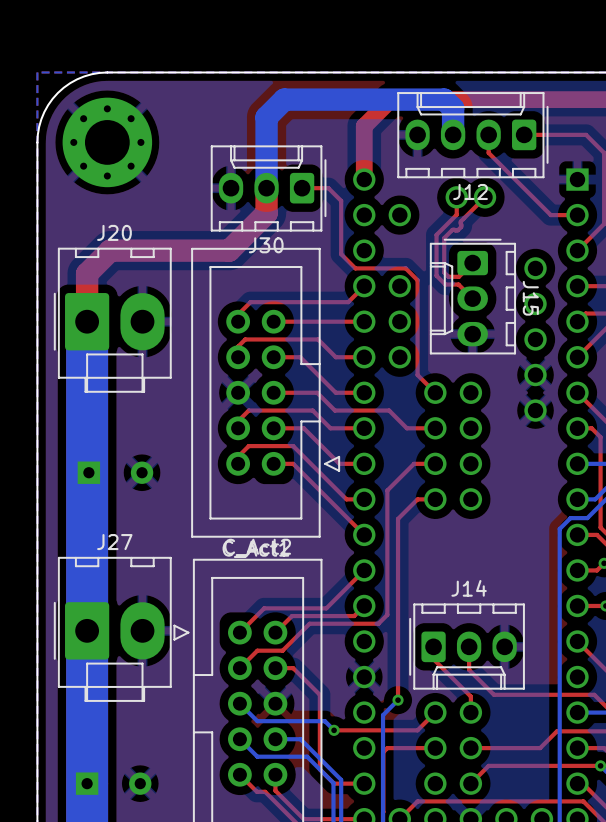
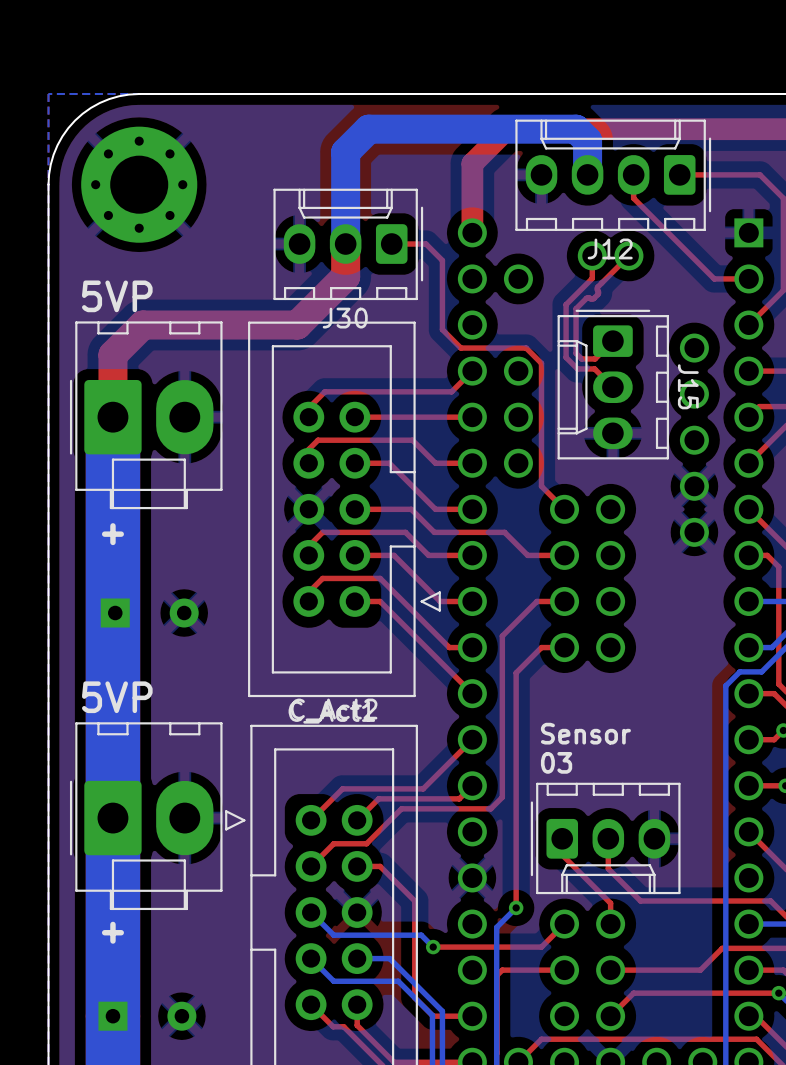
text: none -> 5VP (117, 296)
J20 name: J20 (114, 232) -> none
text: none -> + (112, 534)
text: none -> 5VP (117, 697)
J27 name: J27 (114, 542) -> none
text: none -> Sensor (585, 733)
text: none -> 03 (556, 762)
J14 name: J14 (469, 588) -> none
text: none -> + (112, 932)

